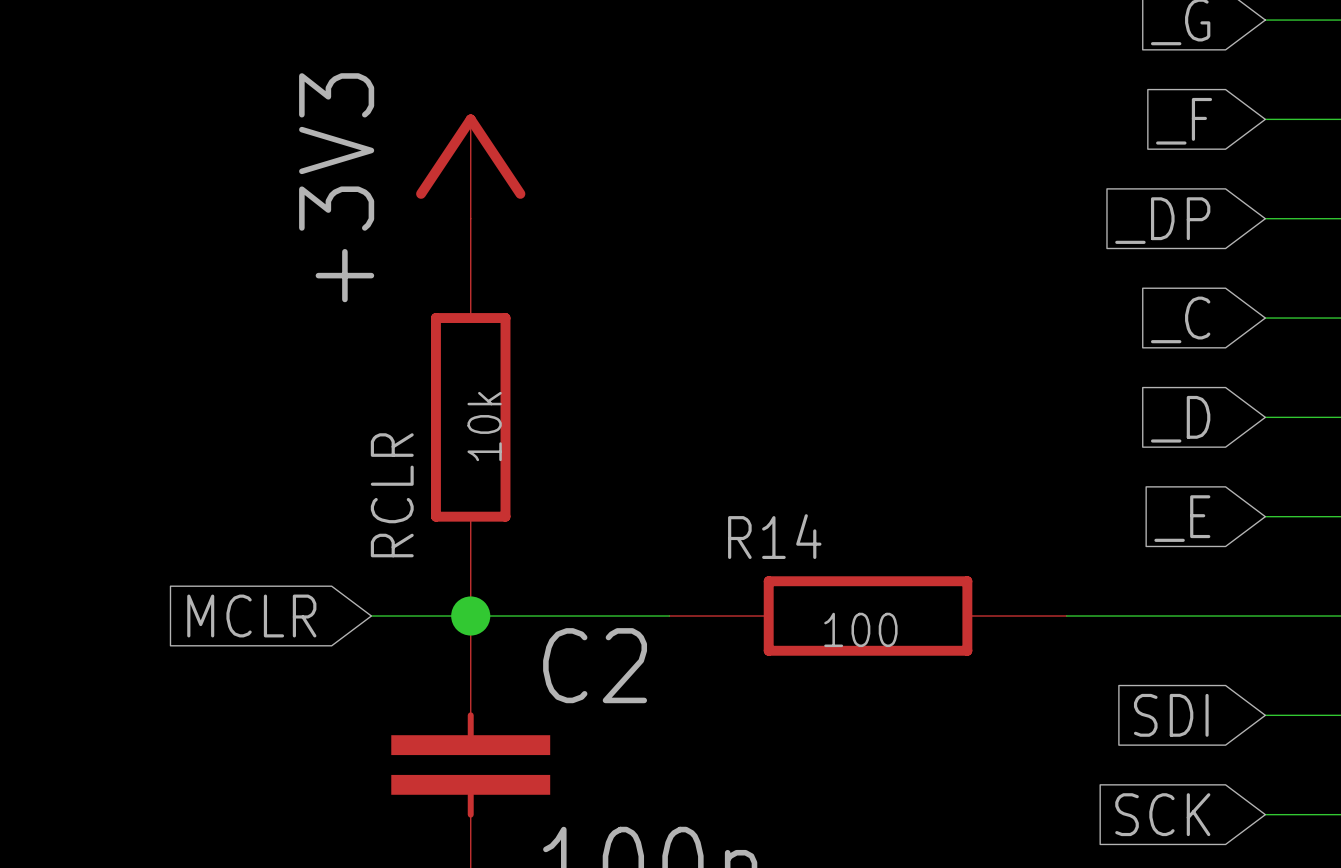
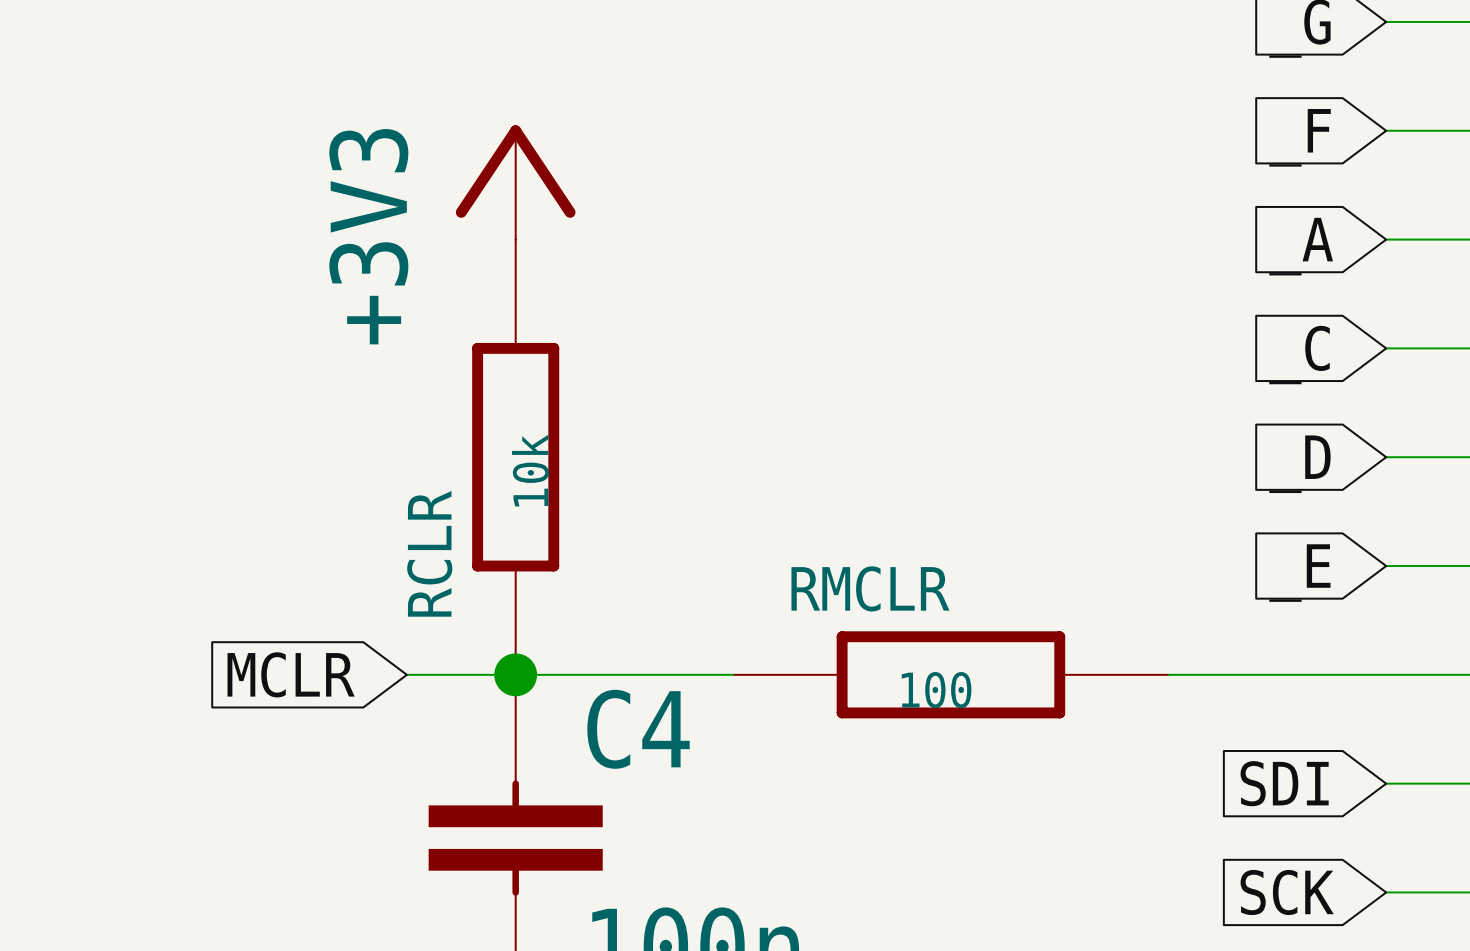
global label: _DP (1162, 220) -> _A (1301, 246)
R14 name: R14 (774, 536) -> RMCLR (870, 588)
C2 name: C2 (595, 665) -> C4 (638, 729)

